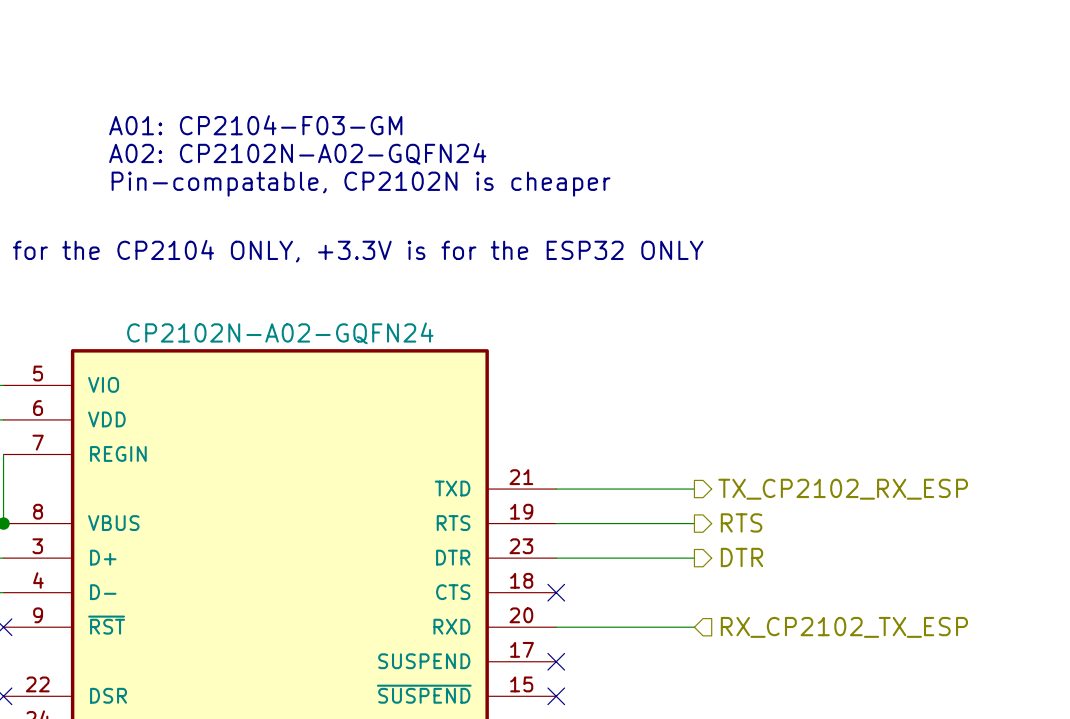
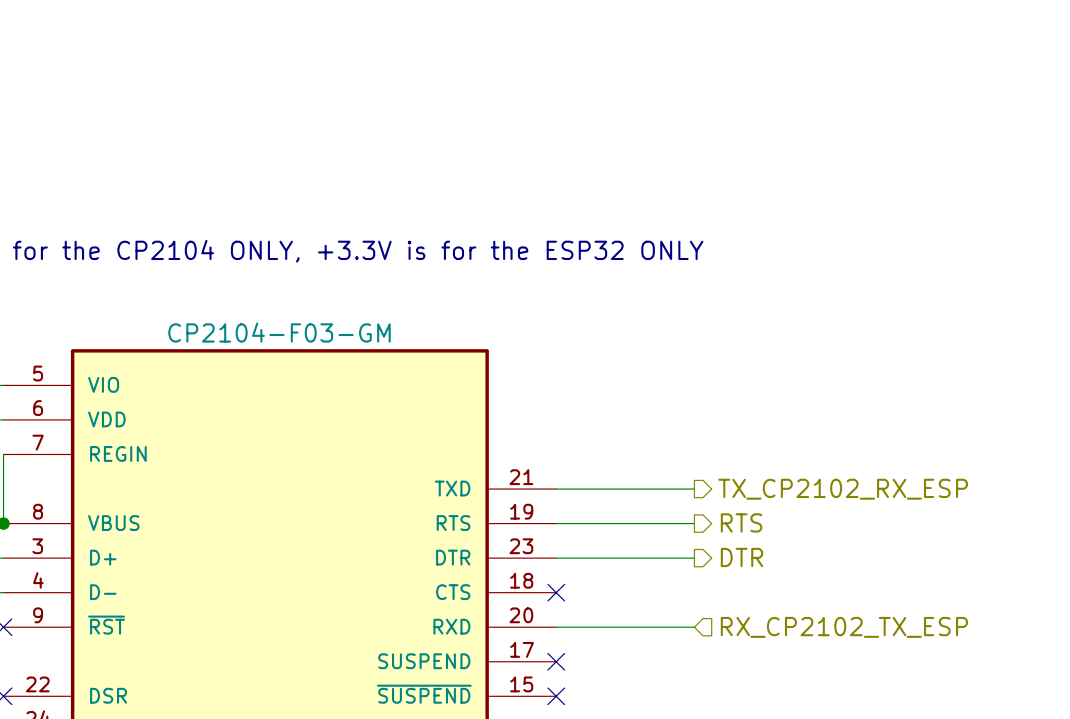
text: A01: CP2104-F03-GM (255, 125) -> none
text: A02: CP2102N-A02-GQFN24 (297, 153) -> none
text: Pin-compatable, CP2102N is cheaper (361, 184) -> none
part value: CP2102N-A02-GQFN24 (280, 333) -> CP2104-F03-GM (279, 332)

